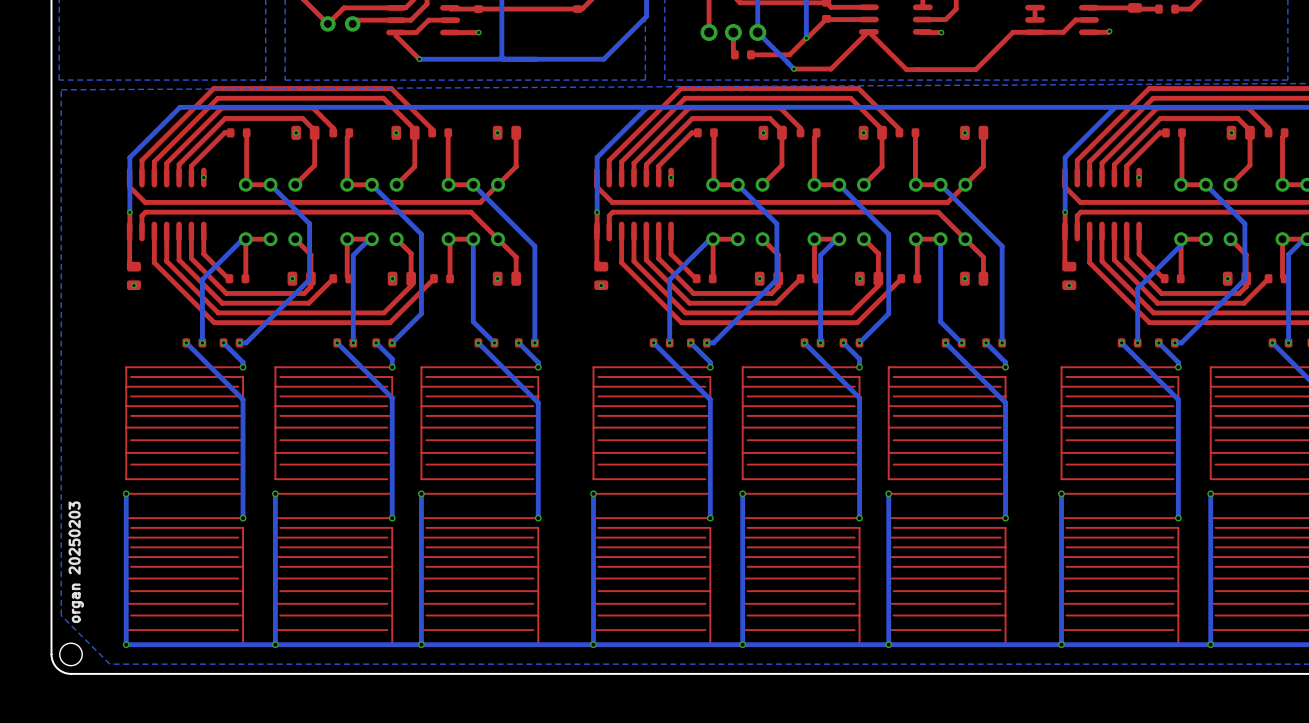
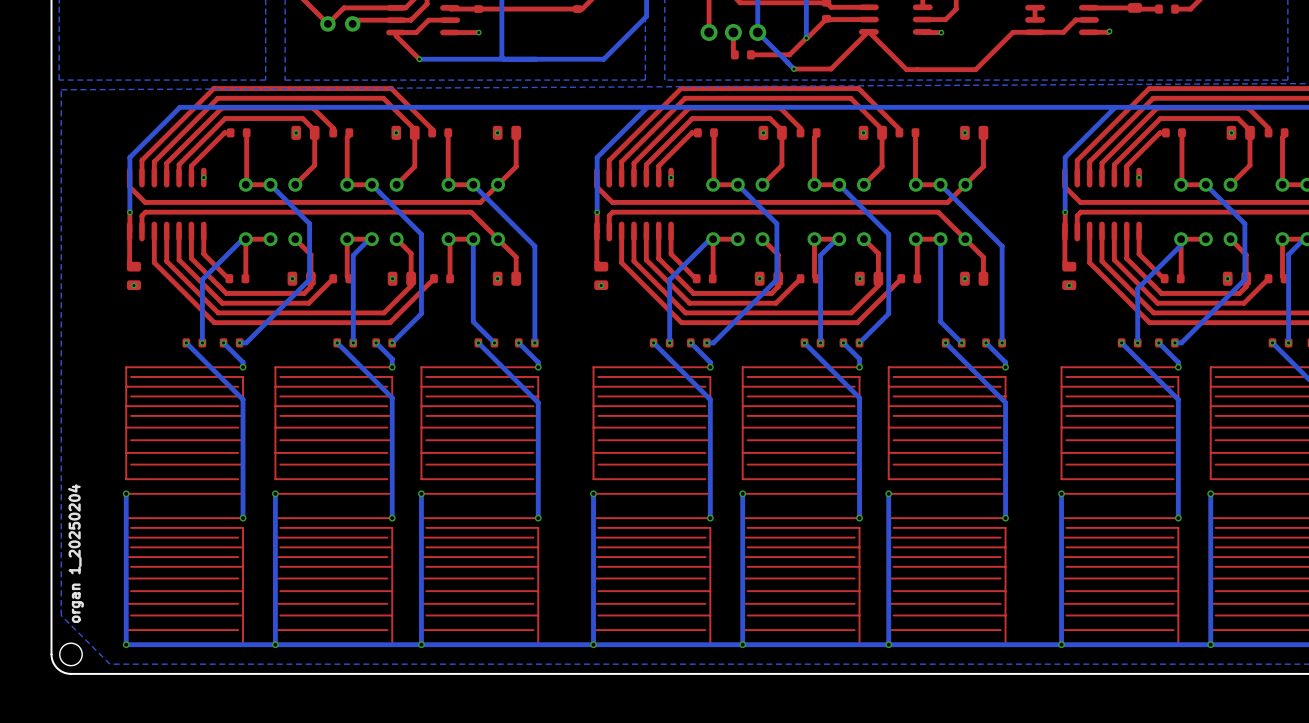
text: organ 20250203 (76, 562) -> organ 1_20250204 (76, 553)

